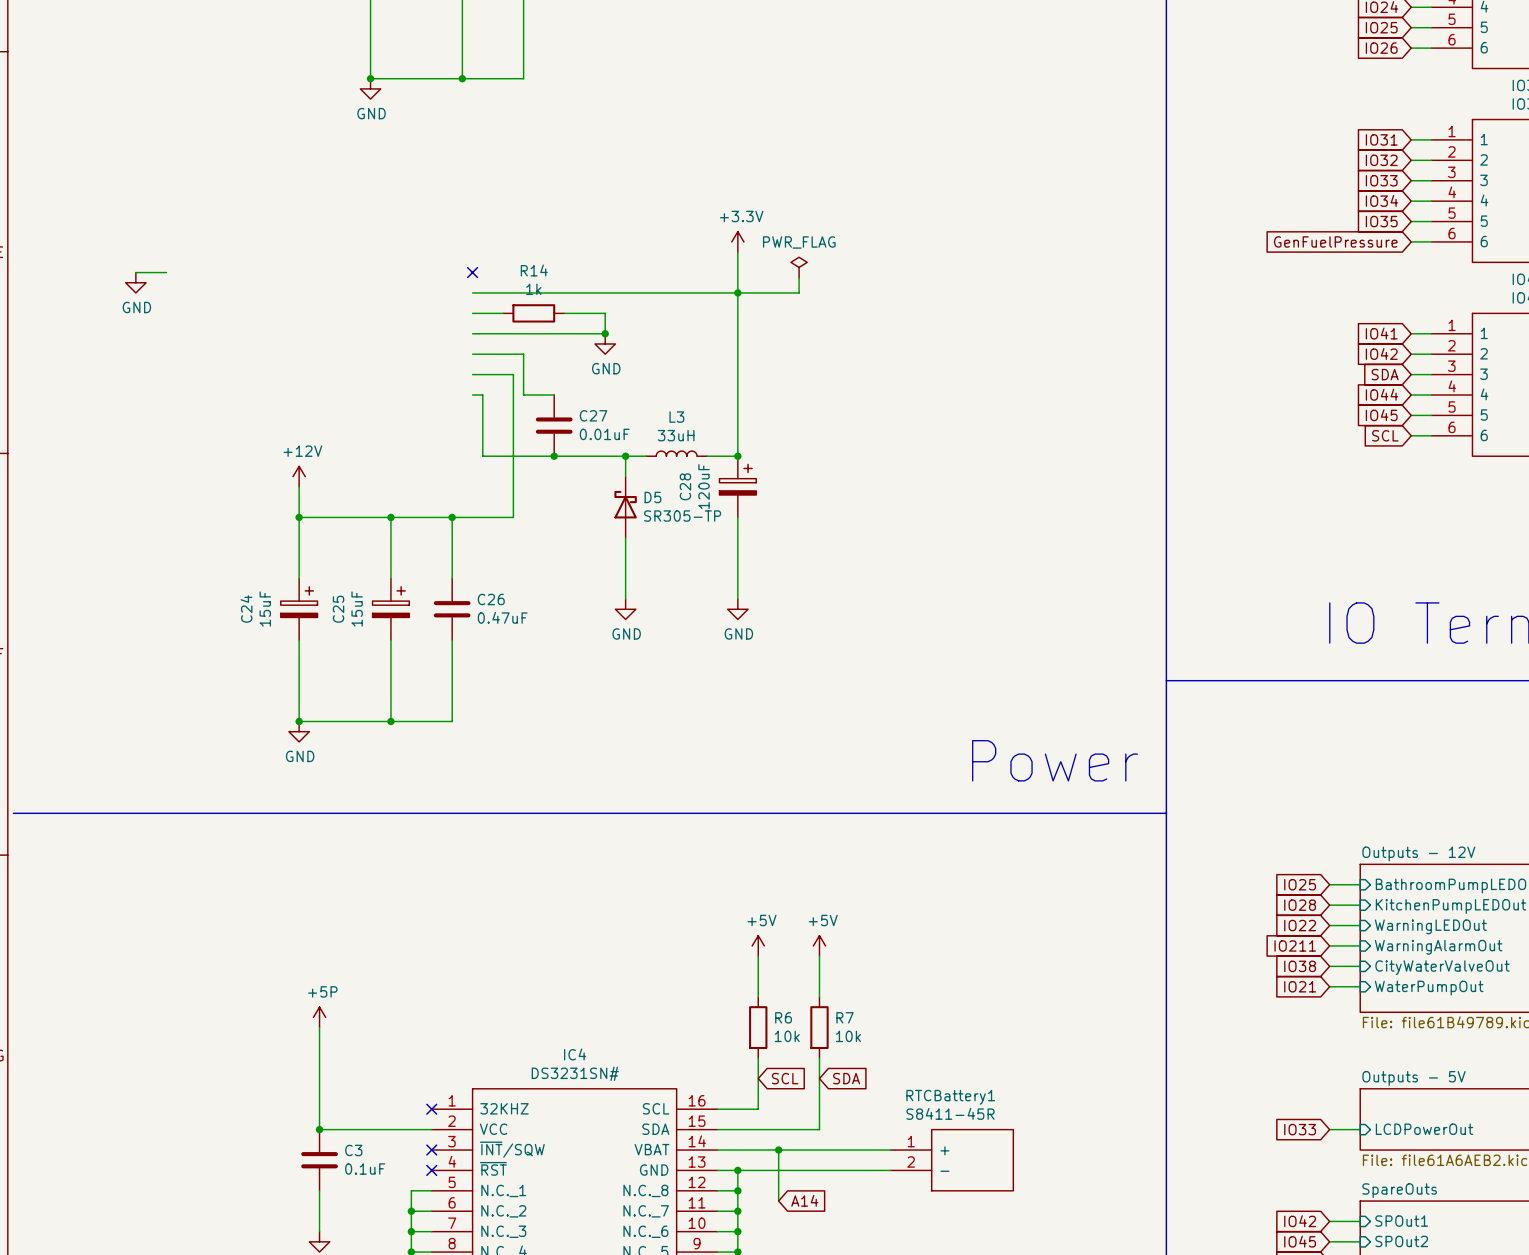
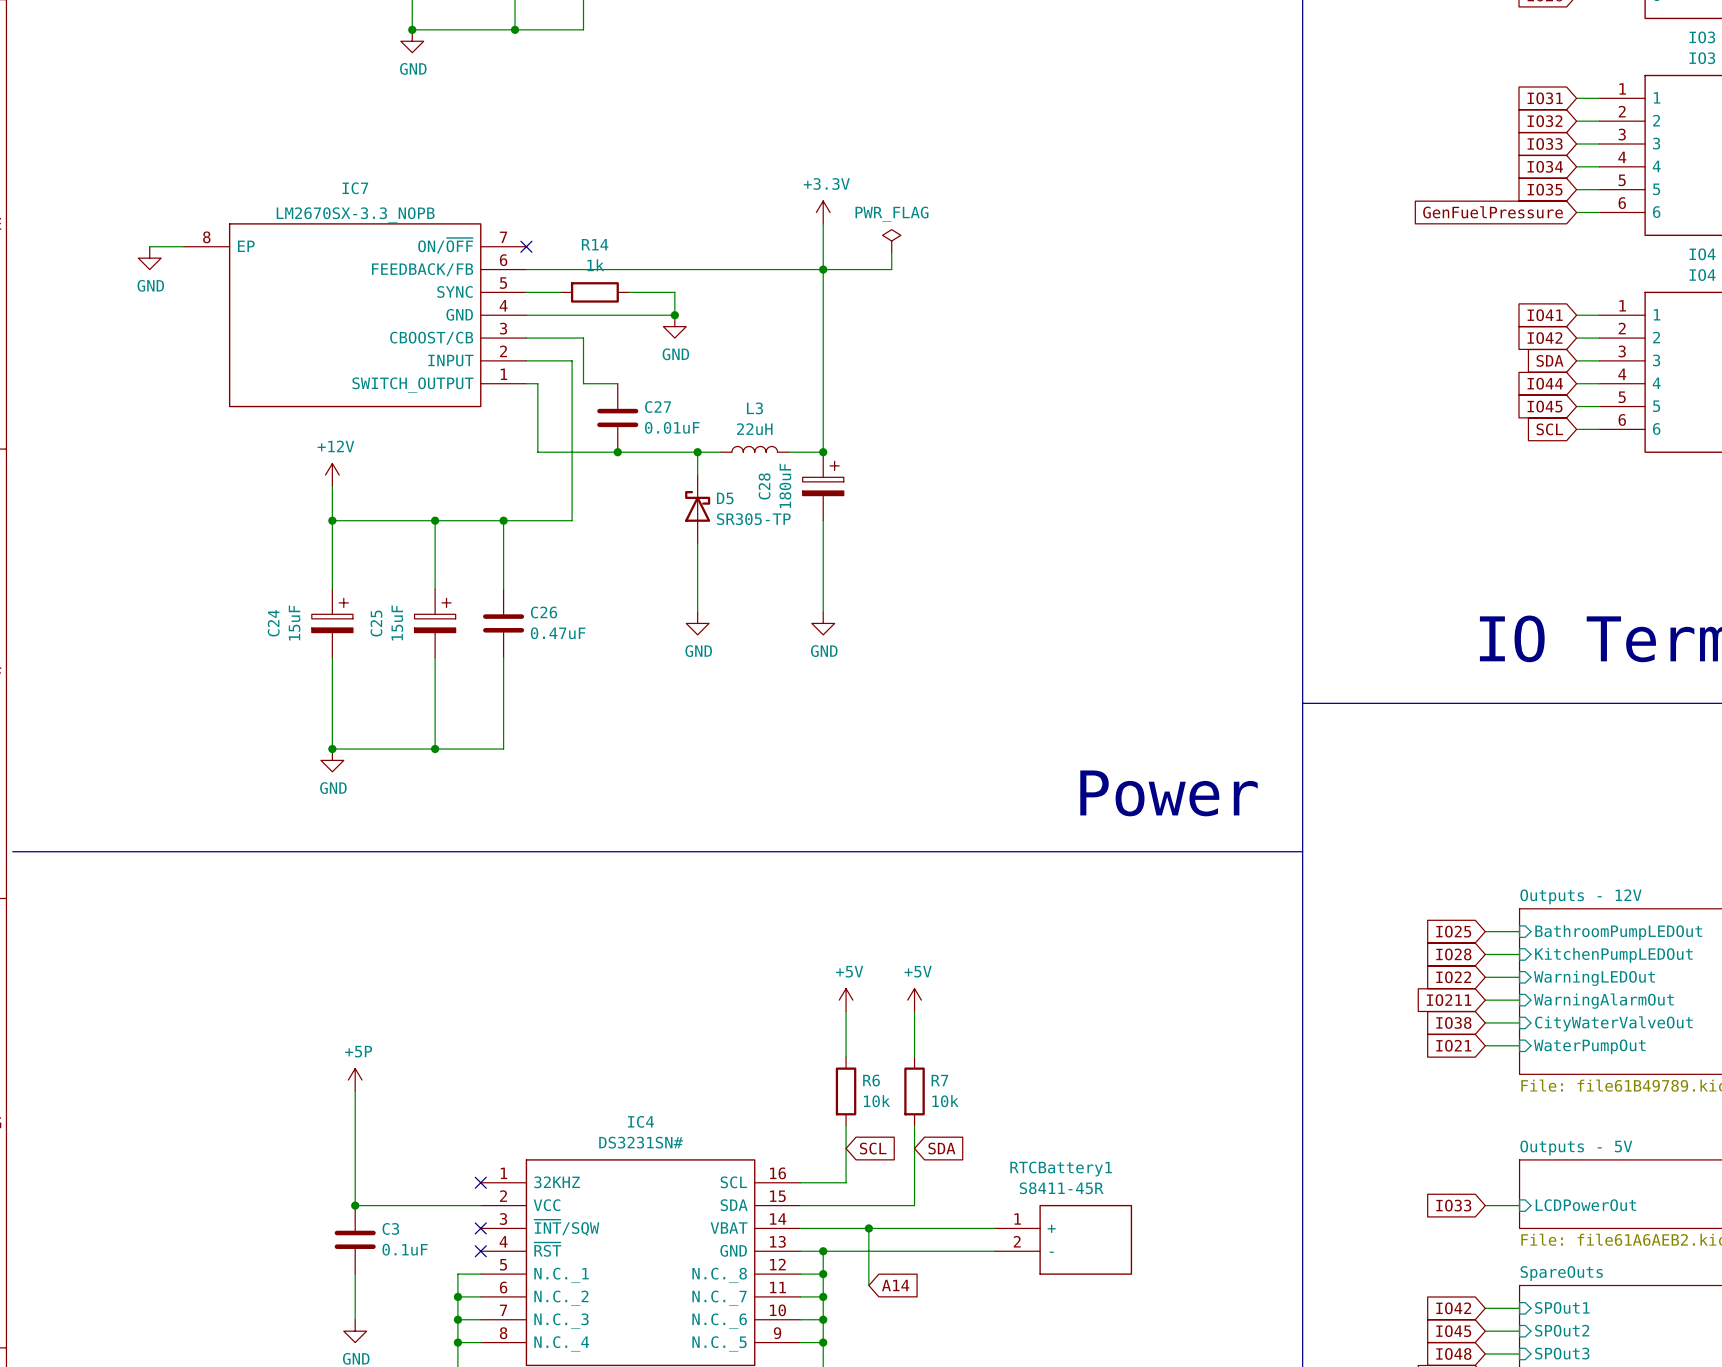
IC7: none -> LM2670SX-3.3_NOPB (355, 315)
L3 value: 33uH (676, 435) -> 22uH (754, 429)
C28 value: 120uF (704, 486) -> 180uF (785, 485)

